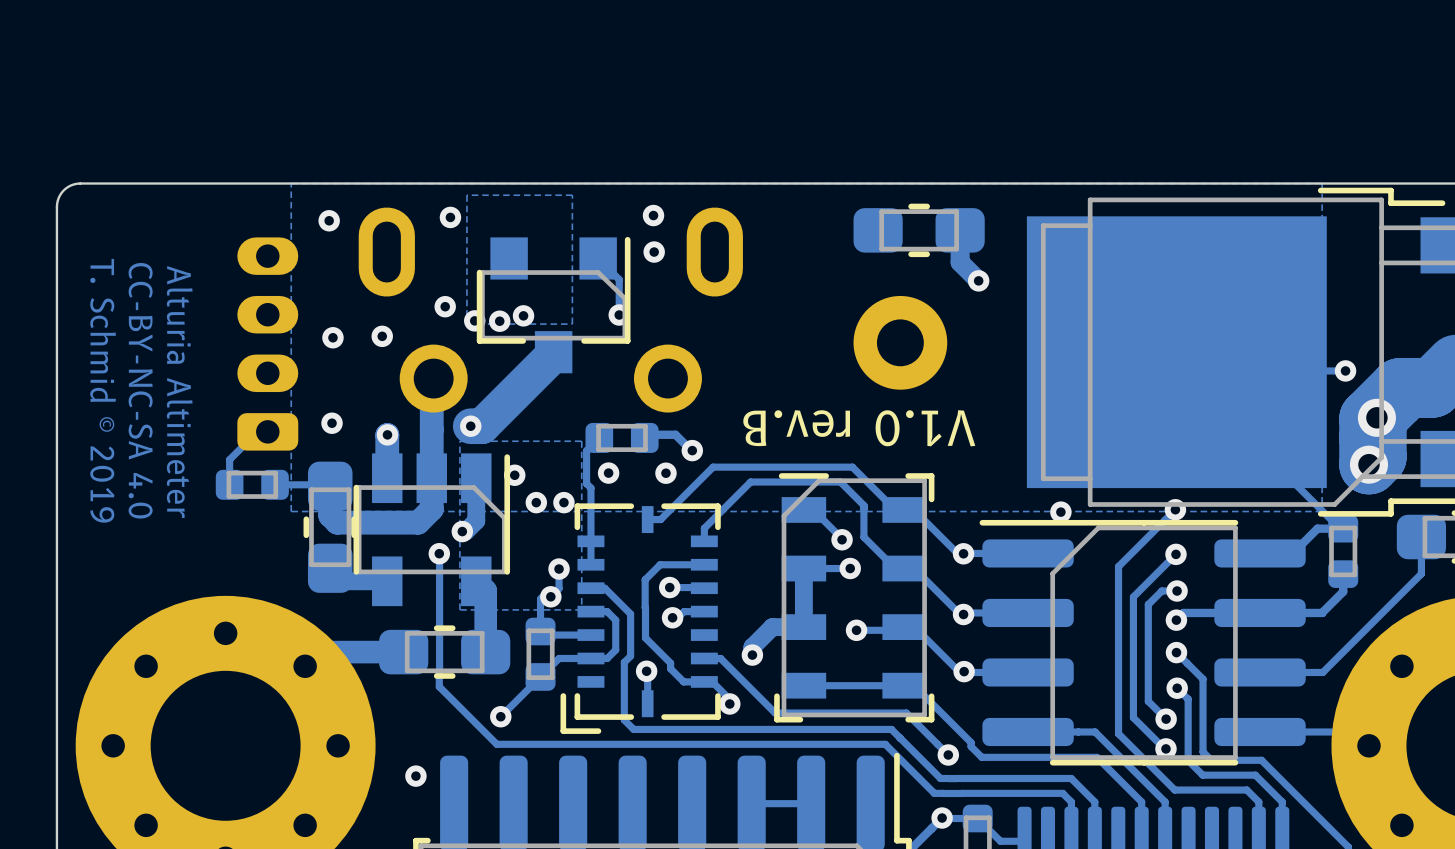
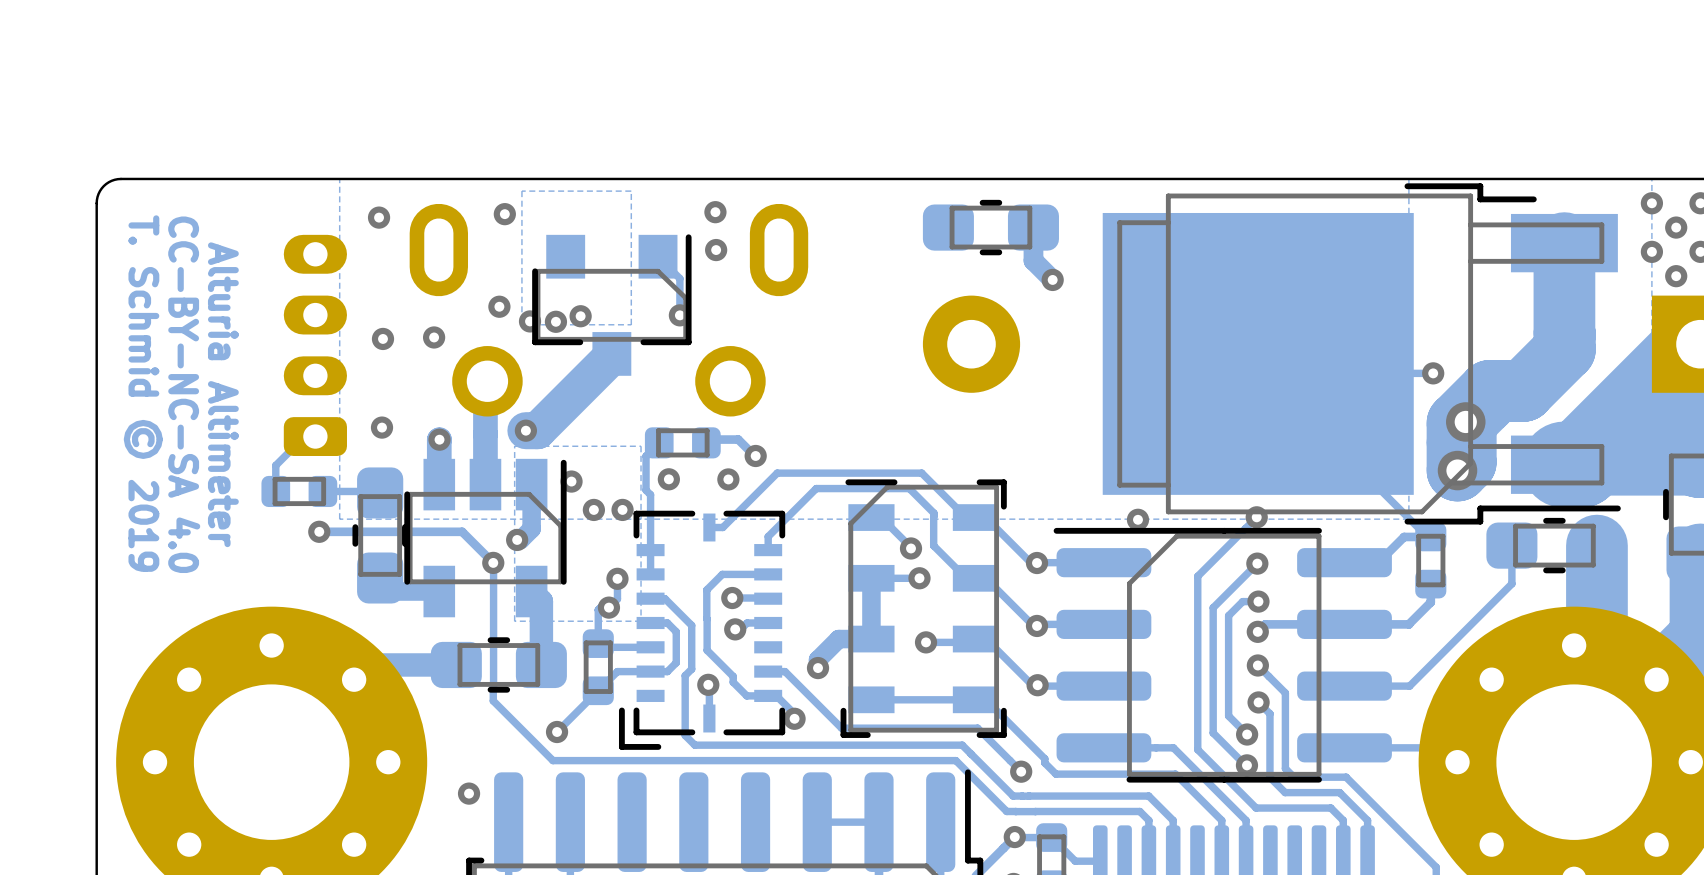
text: V1.0 rev.B (859, 428) -> none
track: (431, 478) (431, 509) (418, 522) (337, 522) (330, 515) (330, 486) -> none
track: none -> (319, 531) (462, 531) (493, 562)
via: none -> (319, 531)

